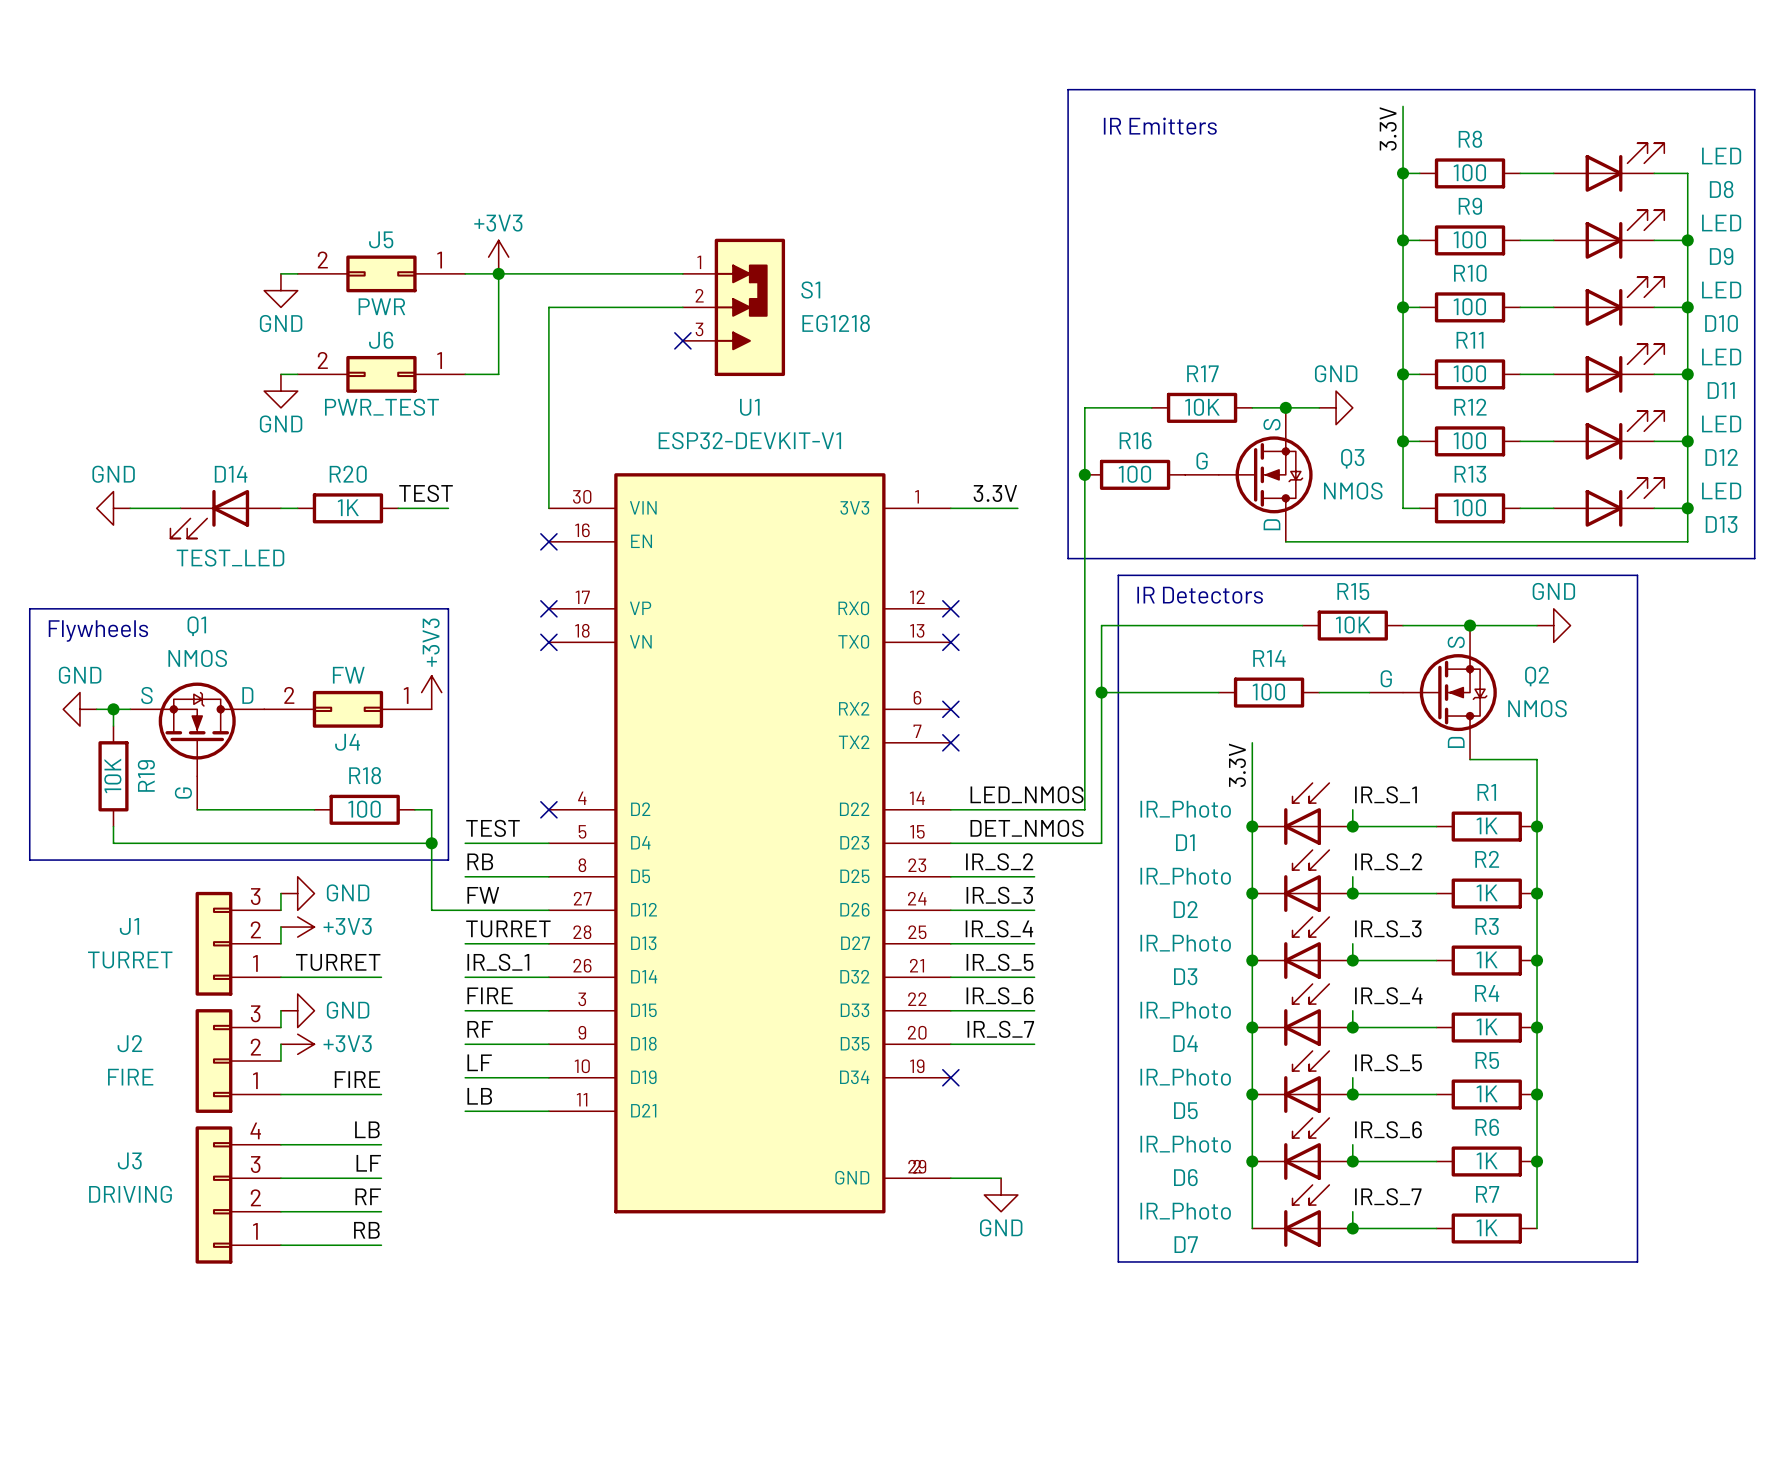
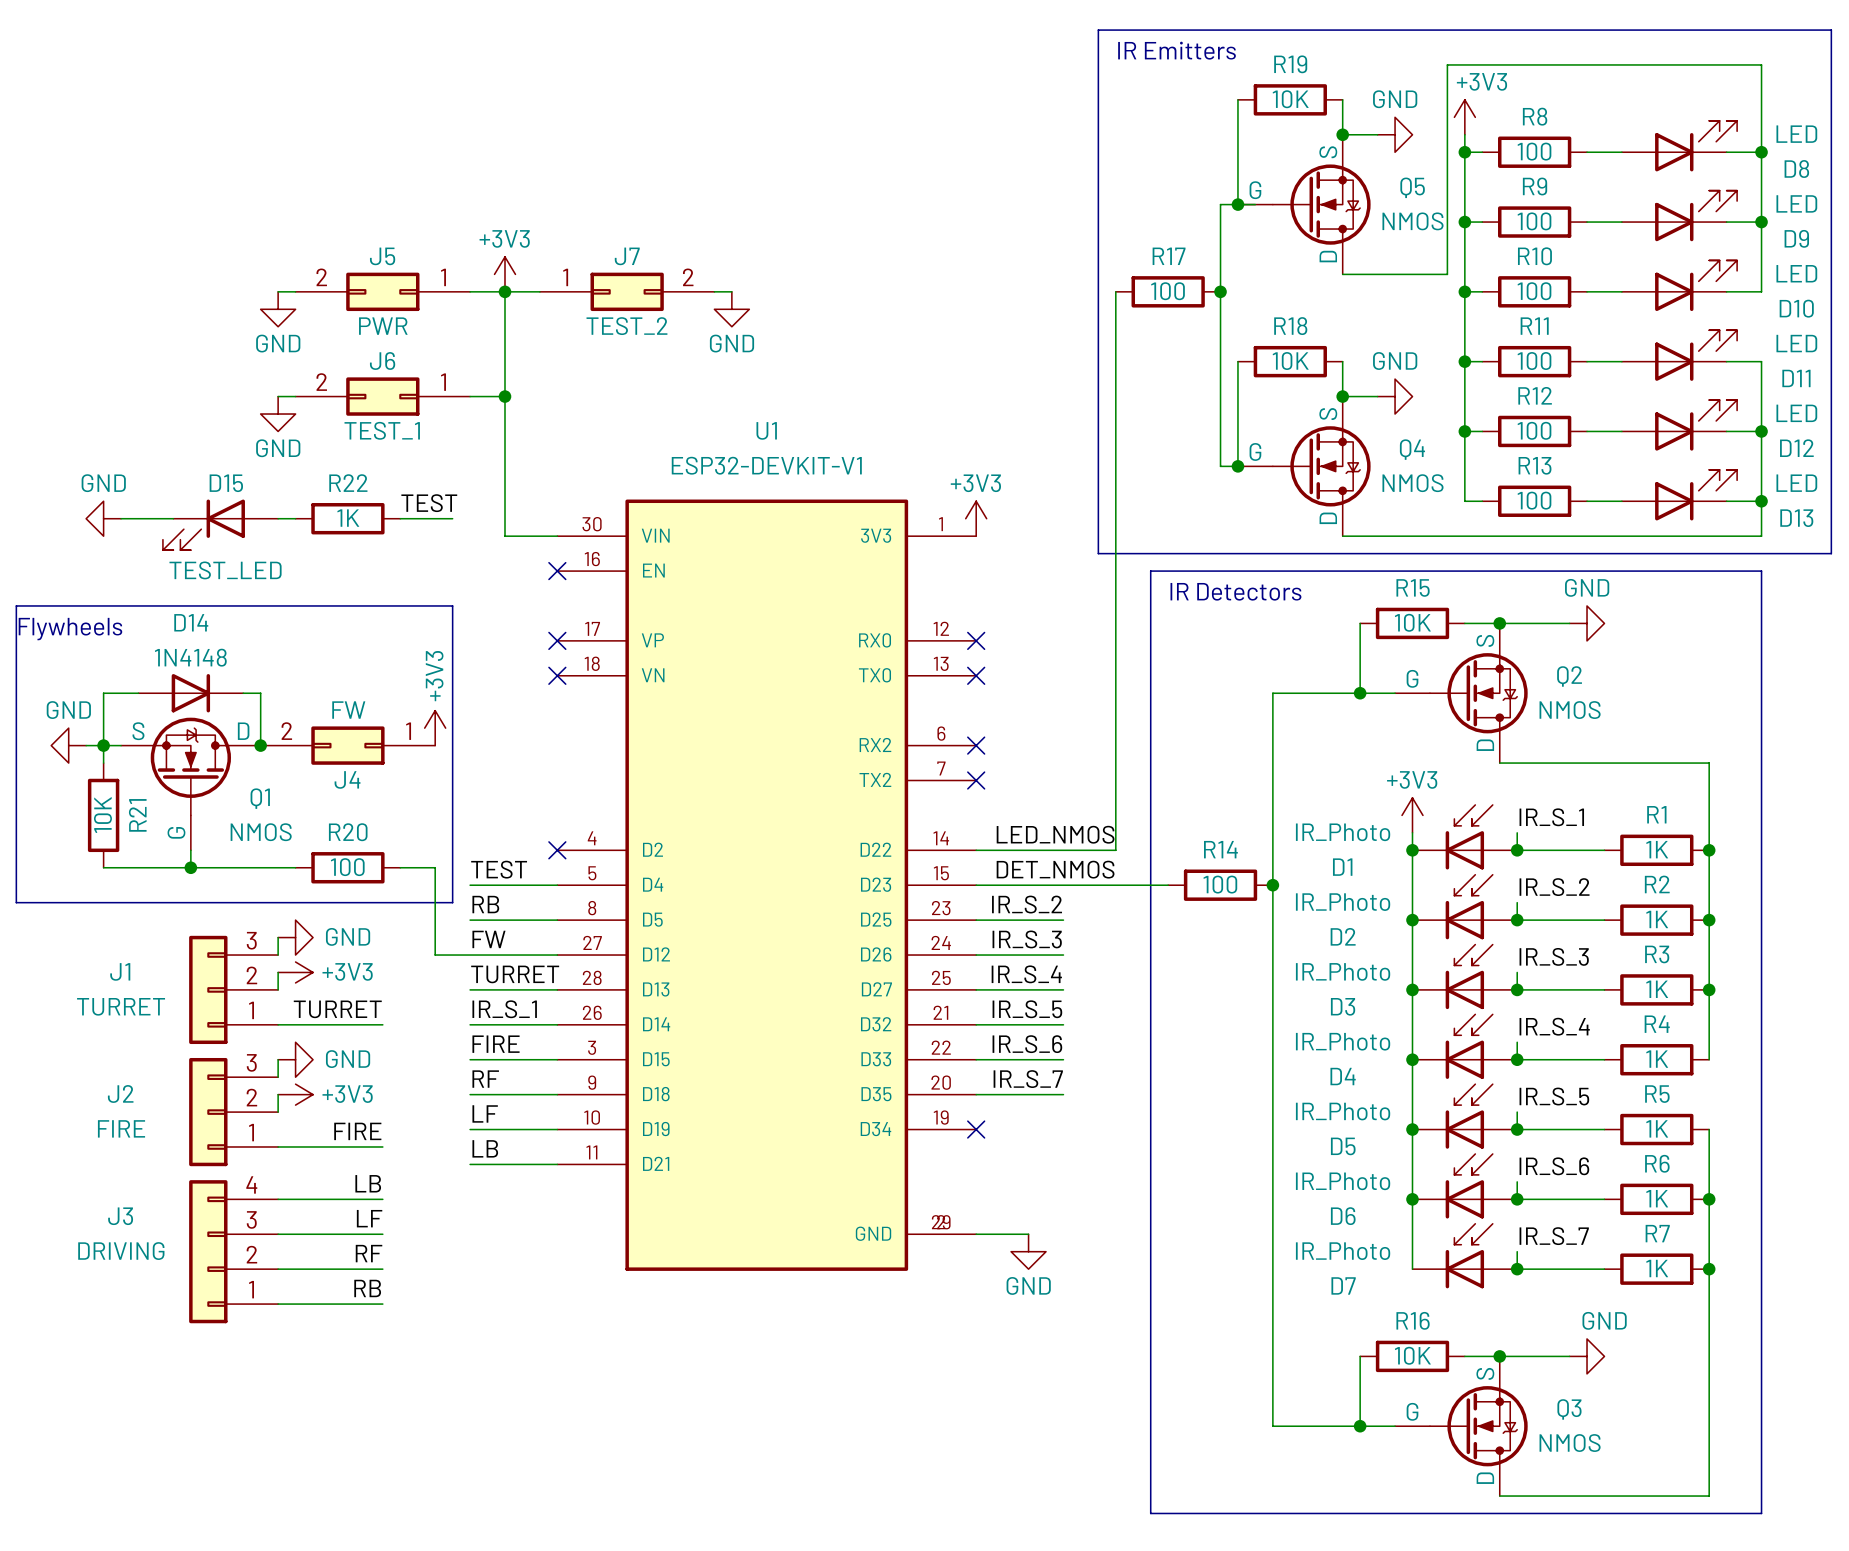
line: (1068, 89) (1754, 89) (1754, 558) (1068, 558) (1068, 525) -> (1098, 99) (1098, 30) (1831, 30) (1831, 553) (1098, 553)
wire: none -> (1237, 99) (1237, 204)
R19: none -> 10K (1290, 99)
wire: none -> (1342, 99) (1342, 134) (1377, 134)
wire: none -> (1447, 117) (1447, 64) (1761, 64) (1761, 291) (1726, 291)
power symbol: none -> +3V3 (1464, 117)
junction: none -> (1342, 134)
power symbol: none -> GND (1395, 134)
wire: none -> (1464, 134) (1464, 501) (1482, 501)
text position: IR Emitters (1160, 126) -> IR Emitters (1177, 50)
label: 3.3V (1388, 128) -> none
junction: none -> (1464, 152)
junction: none -> (1761, 152)
D8 position: (1609, 167) -> (1679, 146)
wire: (1403, 173) (1419, 173) -> (1464, 152) (1482, 152)
junction: (1403, 173) -> none
R8 position: (1470, 173) -> (1534, 152)
wire: (1520, 173) (1553, 173) -> (1587, 152) (1621, 152)
wire: (1654, 173) (1687, 173) (1687, 541) (1285, 541) -> none
junction: none -> (1237, 204)
wire: none -> (1255, 204) (1220, 204) (1220, 466) (1237, 466) (1237, 361)
Q5: none -> NMOS (1304, 204)
junction: none -> (1464, 222)
D9 position: (1609, 234) -> (1679, 215)
wire: (1403, 240) (1419, 240) -> (1464, 222) (1482, 222)
junction: (1403, 240) -> none
R9 position: (1470, 240) -> (1534, 222)
wire: (1520, 240) (1553, 240) -> (1587, 222) (1621, 222)
wire: (1654, 240) (1687, 240) -> (1726, 222) (1761, 222)
junction position: (1687, 240) -> (1761, 222)
wire: (1403, 257) (1403, 508) -> (1447, 274) (1342, 274)
J7: none -> TEST_2 (627, 291)
junction: none -> (1220, 291)
junction: none -> (1464, 291)
power symbol: none -> GND (731, 309)
D10 position: (1609, 301) -> (1679, 285)
wire: (682, 307) (548, 307) (548, 508) -> (504, 396) (504, 536) (557, 536)
S1: EG1218 (733, 307) -> none
wire: (1403, 307) (1419, 307) -> (1464, 291) (1482, 291)
junction: (1403, 307) -> none
R10 position: (1470, 307) -> (1534, 291)
wire: (1520, 307) (1553, 307) -> (1587, 291) (1621, 291)
wire: (1654, 307) (1687, 307) -> (1726, 152) (1761, 152)
junction: (1687, 307) -> none
no-connect mark: (682, 340) -> none
wire: none -> (1342, 361) (1342, 396) (1377, 396)
junction: none -> (1464, 361)
wire: none -> (1726, 361) (1761, 361) (1761, 536) (1744, 536)
D11 position: (1609, 368) -> (1679, 355)
junction: none -> (504, 396)
wire: (1403, 374) (1419, 374) -> (1464, 361) (1482, 361)
junction: (1403, 374) -> none
R11 position: (1470, 374) -> (1534, 361)
wire: (1520, 374) (1553, 374) -> (1587, 361) (1621, 361)
wire: (1654, 374) (1687, 374) -> (1726, 501) (1761, 501)
junction: (1687, 374) -> none
J6 value: PWR_TEST (381, 407) -> TEST_1 (382, 430)
wire: (1084, 407) (1151, 407) -> (1115, 431) (1115, 291)
R17 position: (1202, 407) -> (1168, 291)
R17 value: 10K (1202, 407) -> 100 (1168, 291)
wire: (1252, 407) (1319, 407) -> none
junction position: (1285, 407) -> (1342, 396)
power symbol position: GND (1336, 407) -> GND (1395, 396)
junction: none -> (1464, 431)
junction: none -> (1761, 431)
D12 position: (1609, 435) -> (1679, 425)
junction: none -> (1237, 466)
Q4: none -> NMOS (1304, 466)
wire: (1403, 441) (1419, 441) -> (1464, 431) (1482, 431)
junction: (1403, 441) -> none
R12 position: (1470, 441) -> (1534, 431)
wire: (1520, 441) (1553, 441) -> (1587, 431) (1621, 431)
wire: (1654, 441) (1687, 441) -> (1726, 431) (1761, 431)
junction: (1687, 441) -> none
D14 name position: D14 (231, 474) -> D14 (191, 622)
junction: (1084, 474) -> none
R16 value: 100 (1134, 474) -> 10K (1412, 1355)
R16 position: (1135, 474) -> (1412, 1356)
Q3 position: (1248, 474) -> (1461, 1426)
wire: none -> (1587, 501) (1621, 501)
junction: none -> (1761, 501)
D14 symbol: [170, 489, 281, 539] -> [138, 674, 244, 713]
R22: none -> 1K (347, 518)
power symbol: none -> +3V3 (976, 518)
label position: TEST (426, 493) -> TEST (429, 503)
label: 3.3V (995, 493) -> none
D15: none -> TEST_LED (220, 524)
D13 position: (1609, 502) -> (1679, 495)
R20 value: 1K (348, 507) -> 100 (347, 867)
power symbol position: GND (113, 508) -> GND (103, 518)
wire: (130, 508) (180, 508) -> (121, 518) (173, 518)
wire: (280, 508) (297, 508) -> (278, 518) (295, 518)
R20 position: (347, 508) -> (347, 867)
wire: (398, 508) (448, 508) -> (400, 518) (452, 518)
wire: (950, 508) (1017, 508) -> none
wire: none -> (1342, 536) (1447, 536)
wire: none -> (1464, 536) (1569, 536)
R13 position: (1470, 508) -> (1534, 501)
junction: (1687, 508) -> none
D14 value: TEST_LED (230, 557) -> 1N4148 (190, 657)
line: (1118, 575) (1637, 575) (1637, 1261) (1118, 1261) -> (1150, 605) (1150, 571) (1761, 571) (1761, 1513) (1150, 1513) (1150, 1321)
wire: none -> (1360, 623) (1360, 693)
wire: none -> (1464, 623) (1569, 623)
text position: IR Detectors (1200, 595) -> IR Detectors (1235, 591)
line: (29, 608) (448, 608) -> (16, 640) (16, 605) (452, 605) (452, 640)
wire: (1302, 625) (1101, 625) (1101, 843) -> (1168, 885) (1133, 885)
R15 position: (1352, 625) -> (1412, 623)
wire: (1403, 625) (1537, 625) -> none
junction position: (1470, 625) -> (1499, 623)
power symbol position: GND (1553, 625) -> GND (1587, 623)
Q1 name position: Q1 (196, 626) -> Q1 (260, 798)
text position: Flywheels (98, 631) -> Flywheels (70, 629)
Q1 value position: NMOS (197, 658) -> NMOS (261, 832)
wire: none -> (138, 693) (103, 693) (103, 745)
wire: none -> (243, 693) (260, 693) (260, 745)
junction: none -> (1360, 693)
wire: none -> (1395, 693) (1272, 693) (1272, 1426) (1395, 1426)
wire: (1101, 692) (1218, 692) -> none
junction: (1101, 692) -> none
R14 position: (1269, 692) -> (1220, 885)
wire: (1319, 692) (1369, 692) -> none
Q2 position: (1433, 692) -> (1461, 693)
junction: none -> (260, 745)
wire: none -> (1499, 763) (1709, 763) (1709, 1059)
wire: (1252, 742) (1252, 1228) -> none
wire: (1470, 759) (1537, 759) (1537, 1228) -> none
label: 3.3V (1237, 765) -> none
R19 name: R19 (146, 775) -> R21 (137, 815)
power symbol: none -> +3V3 (1412, 815)
wire: none -> (1412, 832) (1412, 1269)
label position: IR_S_1 (1385, 794) -> IR_S_1 (1551, 817)
wire: (197, 809) (314, 809) -> (190, 850) (190, 867)
R18 position: (364, 809) -> (1290, 361)
R18 value: 100 (364, 809) -> 10K (1290, 361)
wire: (414, 809) (431, 809) (431, 826) -> (400, 867) (435, 867)
wire: (1352, 809) (1352, 826) (1436, 826) -> (1517, 832) (1517, 850) (1604, 850)
junction: none -> (1517, 850)
junction: none -> (1709, 850)
D1 position: (1302, 813) -> (1464, 837)
wire: (113, 826) (113, 843) (431, 843) -> (103, 867) (295, 867)
junction: none -> (190, 867)
junction position: (1252, 826) -> (1272, 885)
junction position: (1352, 826) -> (1412, 850)
R1 position: (1486, 826) -> (1656, 850)
junction: (1537, 826) -> none
junction: (431, 843) -> none
label position: IR_S_2 (1388, 861) -> IR_S_2 (1554, 887)
wire: (1352, 876) (1352, 893) (1436, 893) -> (1517, 902) (1517, 920) (1604, 920)
junction: none -> (1517, 920)
junction: none -> (1709, 920)
D2 position: (1302, 880) -> (1464, 907)
junction: (1252, 893) -> none
junction position: (1352, 893) -> (1412, 920)
R2 position: (1486, 893) -> (1656, 920)
junction: (1537, 893) -> none
label position: IR_S_3 (1388, 928) -> IR_S_3 (1554, 956)
wire: (1352, 943) (1352, 960) (1436, 960) -> (1517, 972) (1517, 989) (1604, 989)
junction: none -> (1517, 989)
junction: none -> (1709, 989)
D3 position: (1302, 947) -> (1464, 976)
junction: (1252, 960) -> none
junction position: (1352, 960) -> (1412, 989)
R3 position: (1486, 960) -> (1656, 989)
junction: (1537, 960) -> none
label position: IR_S_4 (1388, 995) -> IR_S_4 (1554, 1026)
wire: (1352, 1010) (1352, 1027) (1436, 1027) -> (1517, 1042) (1517, 1059) (1604, 1059)
junction: none -> (1517, 1059)
D4 position: (1302, 1014) -> (1464, 1046)
junction: (1252, 1027) -> none
junction position: (1352, 1027) -> (1412, 1059)
R4 position: (1486, 1027) -> (1656, 1059)
junction: (1537, 1027) -> none
label position: IR_S_5 (1388, 1062) -> IR_S_5 (1554, 1096)
wire: (1352, 1077) (1352, 1094) (1436, 1094) -> (1517, 1112) (1517, 1129) (1604, 1129)
junction: none -> (1517, 1129)
wire: none -> (1709, 1129) (1709, 1496) (1499, 1496)
D5 position: (1302, 1081) -> (1464, 1116)
junction: (1252, 1094) -> none
junction position: (1352, 1094) -> (1412, 1129)
R5 position: (1486, 1094) -> (1656, 1129)
junction: (1537, 1094) -> none
label position: IR_S_6 (1388, 1129) -> IR_S_6 (1554, 1166)
wire: (1352, 1144) (1352, 1161) (1436, 1161) -> (1517, 1181) (1517, 1199) (1604, 1199)
junction: none -> (1517, 1199)
junction: none -> (1709, 1199)
D6 position: (1302, 1148) -> (1464, 1186)
junction: (1252, 1161) -> none
junction position: (1352, 1161) -> (1412, 1199)
R6 position: (1486, 1161) -> (1656, 1199)
junction: (1537, 1161) -> none
label position: IR_S_7 (1388, 1196) -> IR_S_7 (1554, 1236)
wire: (1352, 1211) (1352, 1228) (1436, 1228) -> (1517, 1251) (1517, 1269) (1604, 1269)
junction: none -> (1517, 1269)
junction: none -> (1709, 1269)
D7 position: (1302, 1215) -> (1464, 1256)
junction: (1352, 1228) -> none
R7 position: (1486, 1228) -> (1656, 1269)
wire: none -> (1360, 1356) (1360, 1426)
wire: none -> (1464, 1356) (1569, 1356)
junction: none -> (1499, 1356)
power symbol: none -> GND (1587, 1356)
junction: none -> (1360, 1426)

